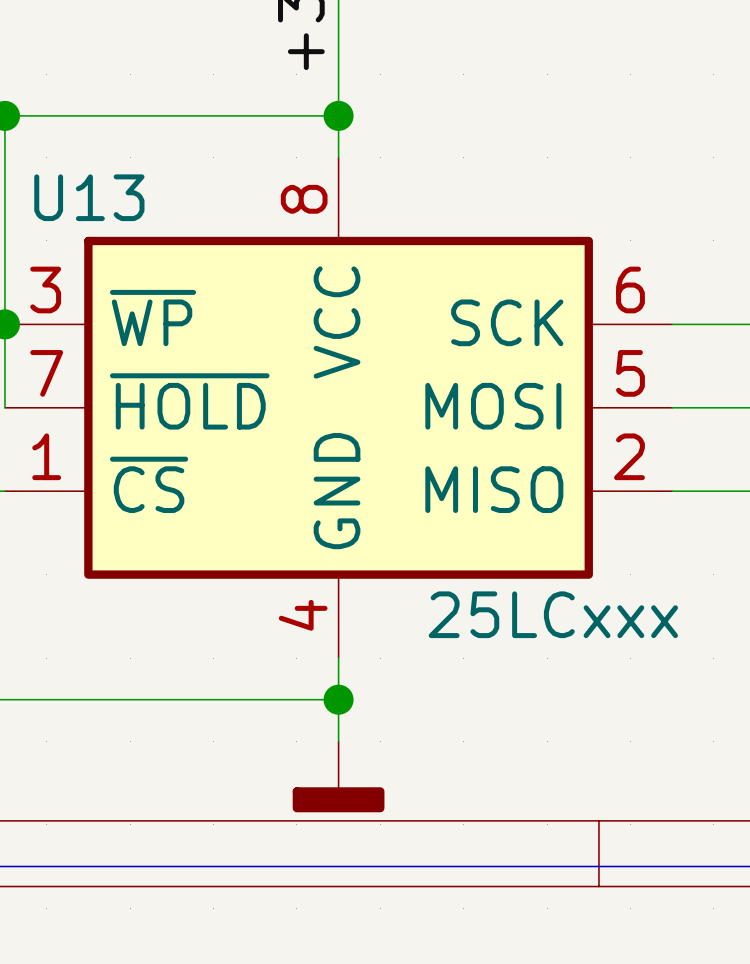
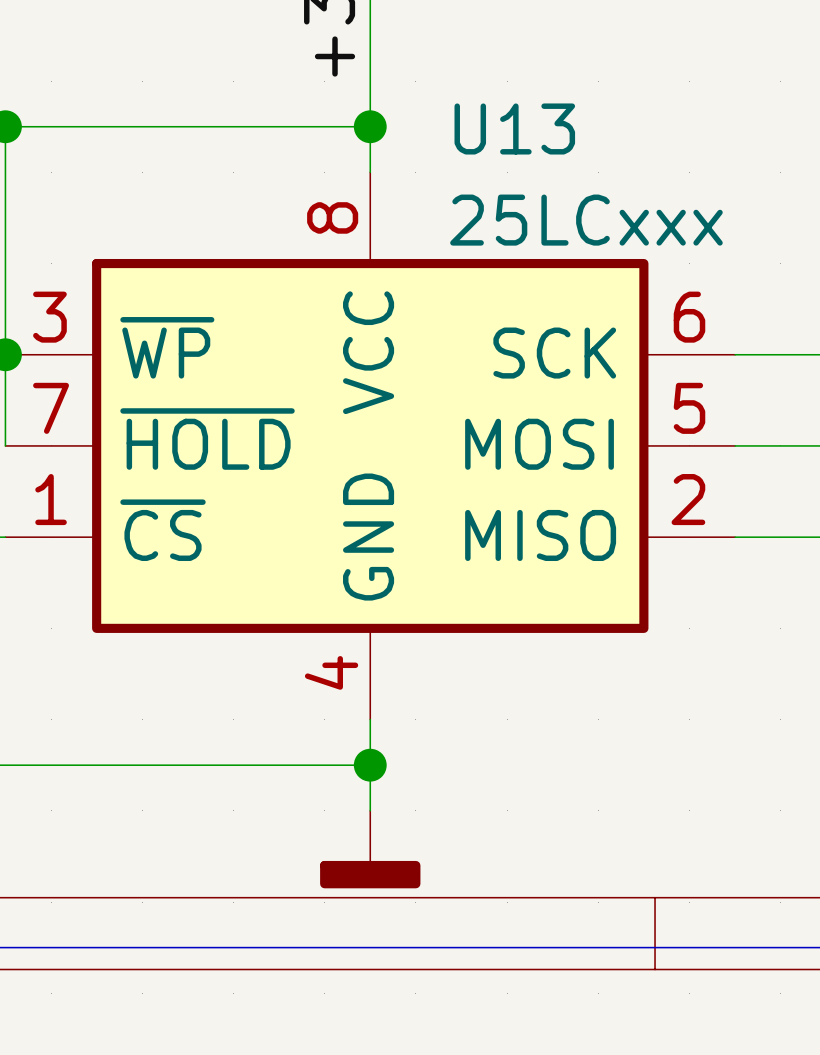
U13 name position: U13 (89, 197) -> U13 (514, 128)
U13 value position: 25LCxxx (553, 614) -> 25LCxxx (586, 220)

